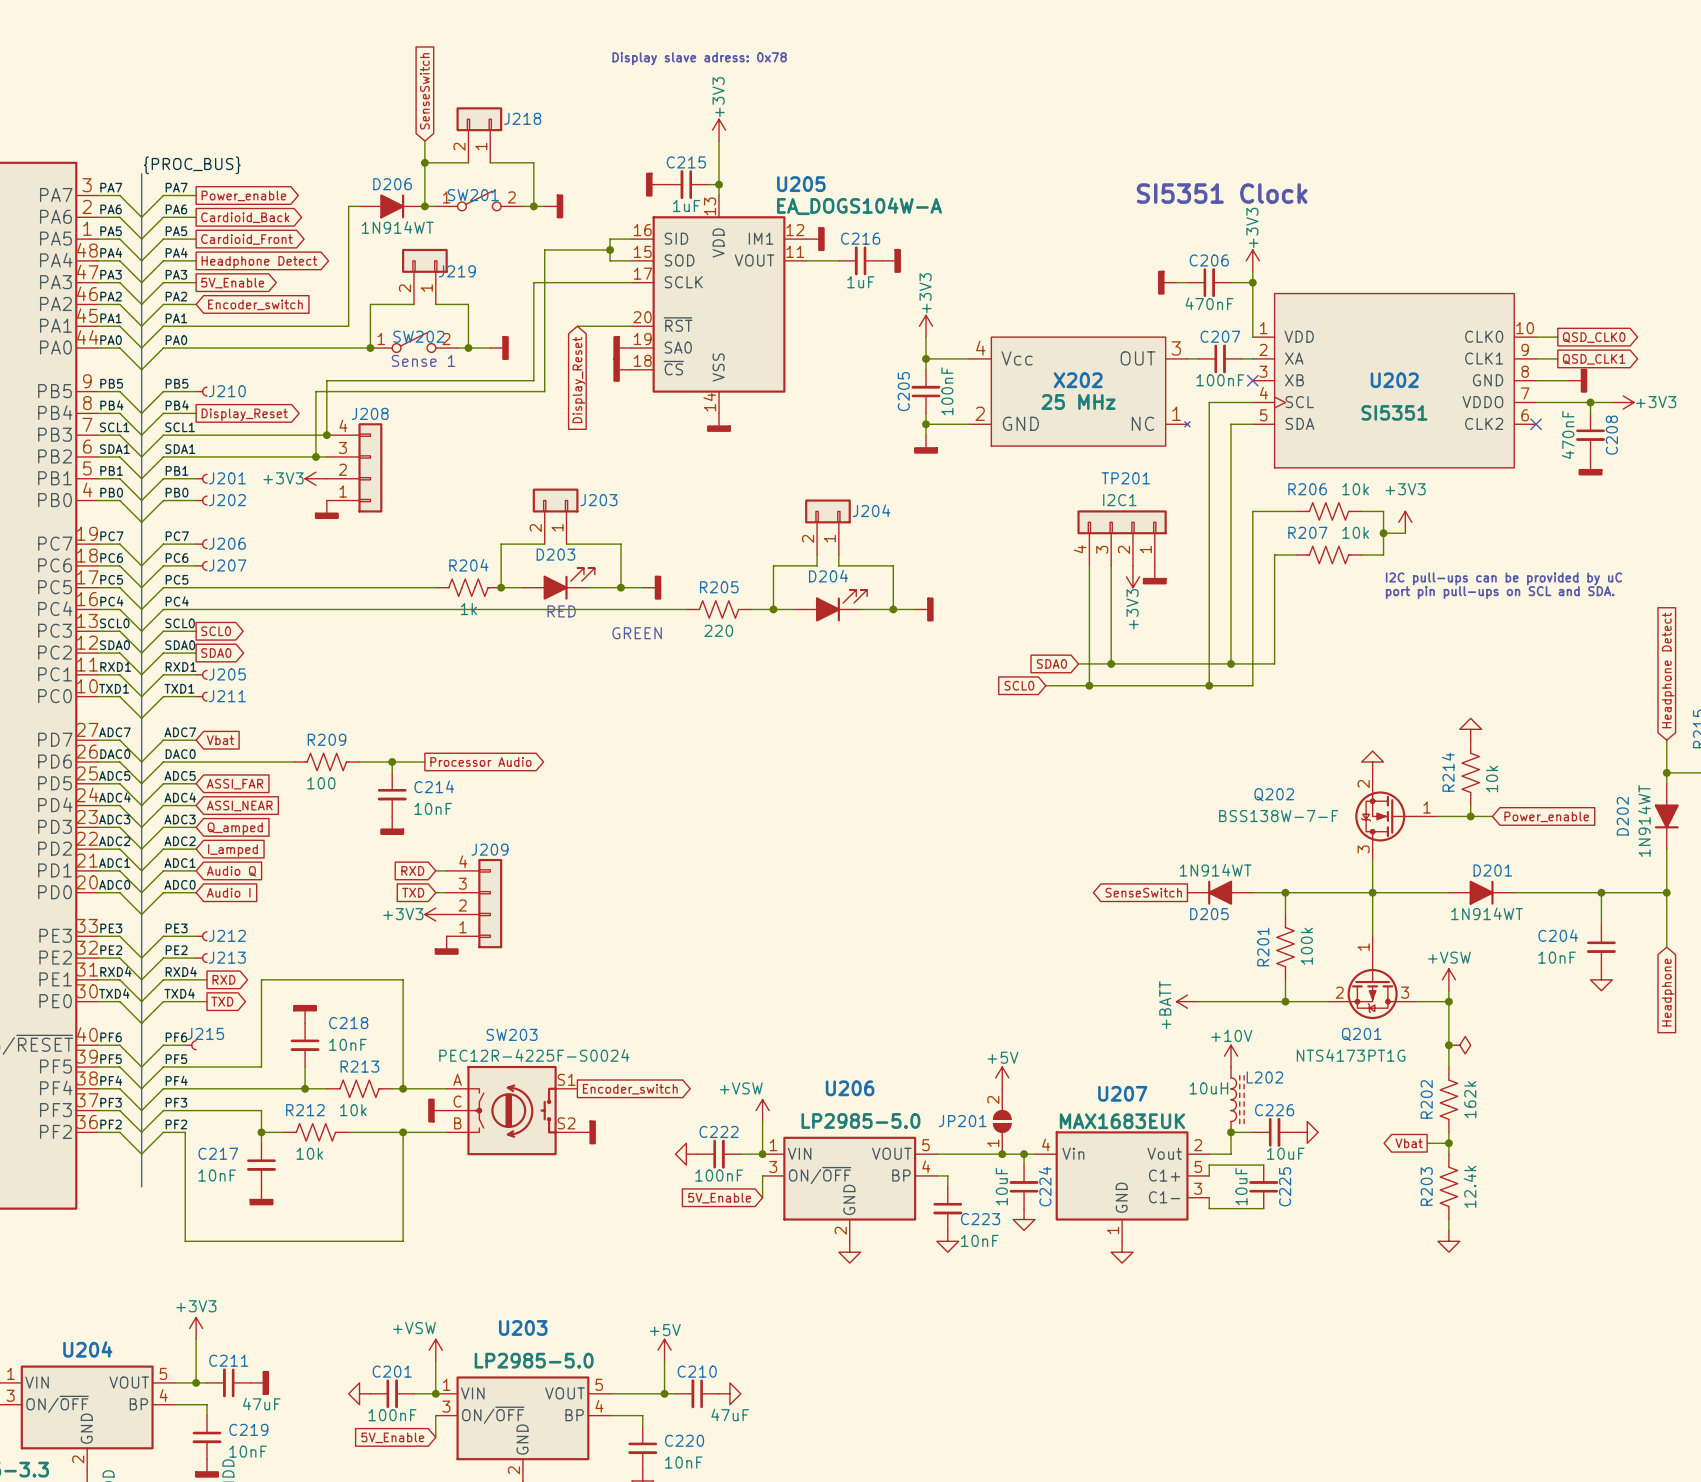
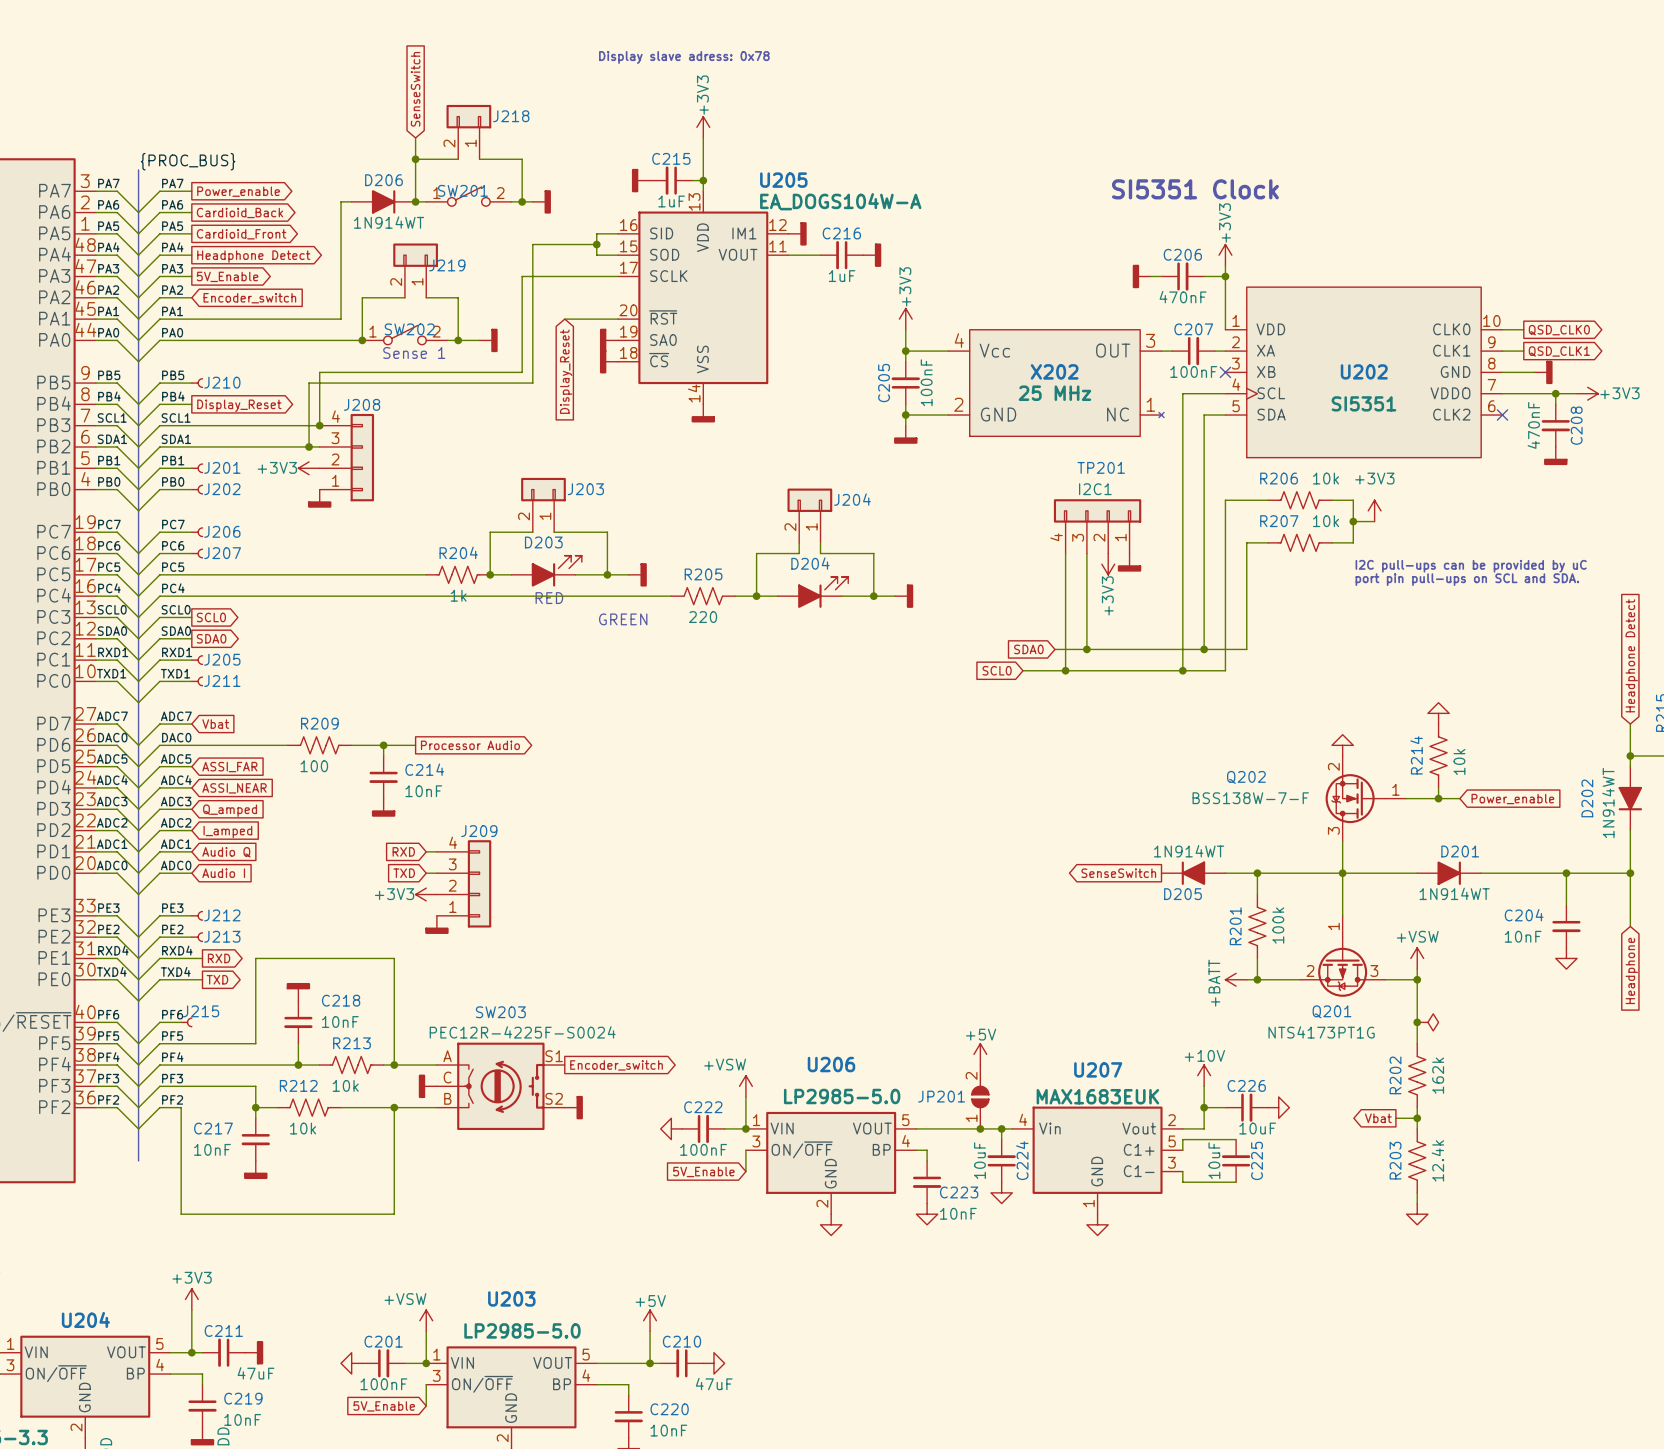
power symbol position: +BATT (1187, 1001) -> +BATT (1236, 979)
wire: (1198, 1001) (1274, 1001) -> none
power symbol position: +10V (1231, 1056) -> +10V (1204, 1075)
L202: 10uH (1237, 1099) -> none

